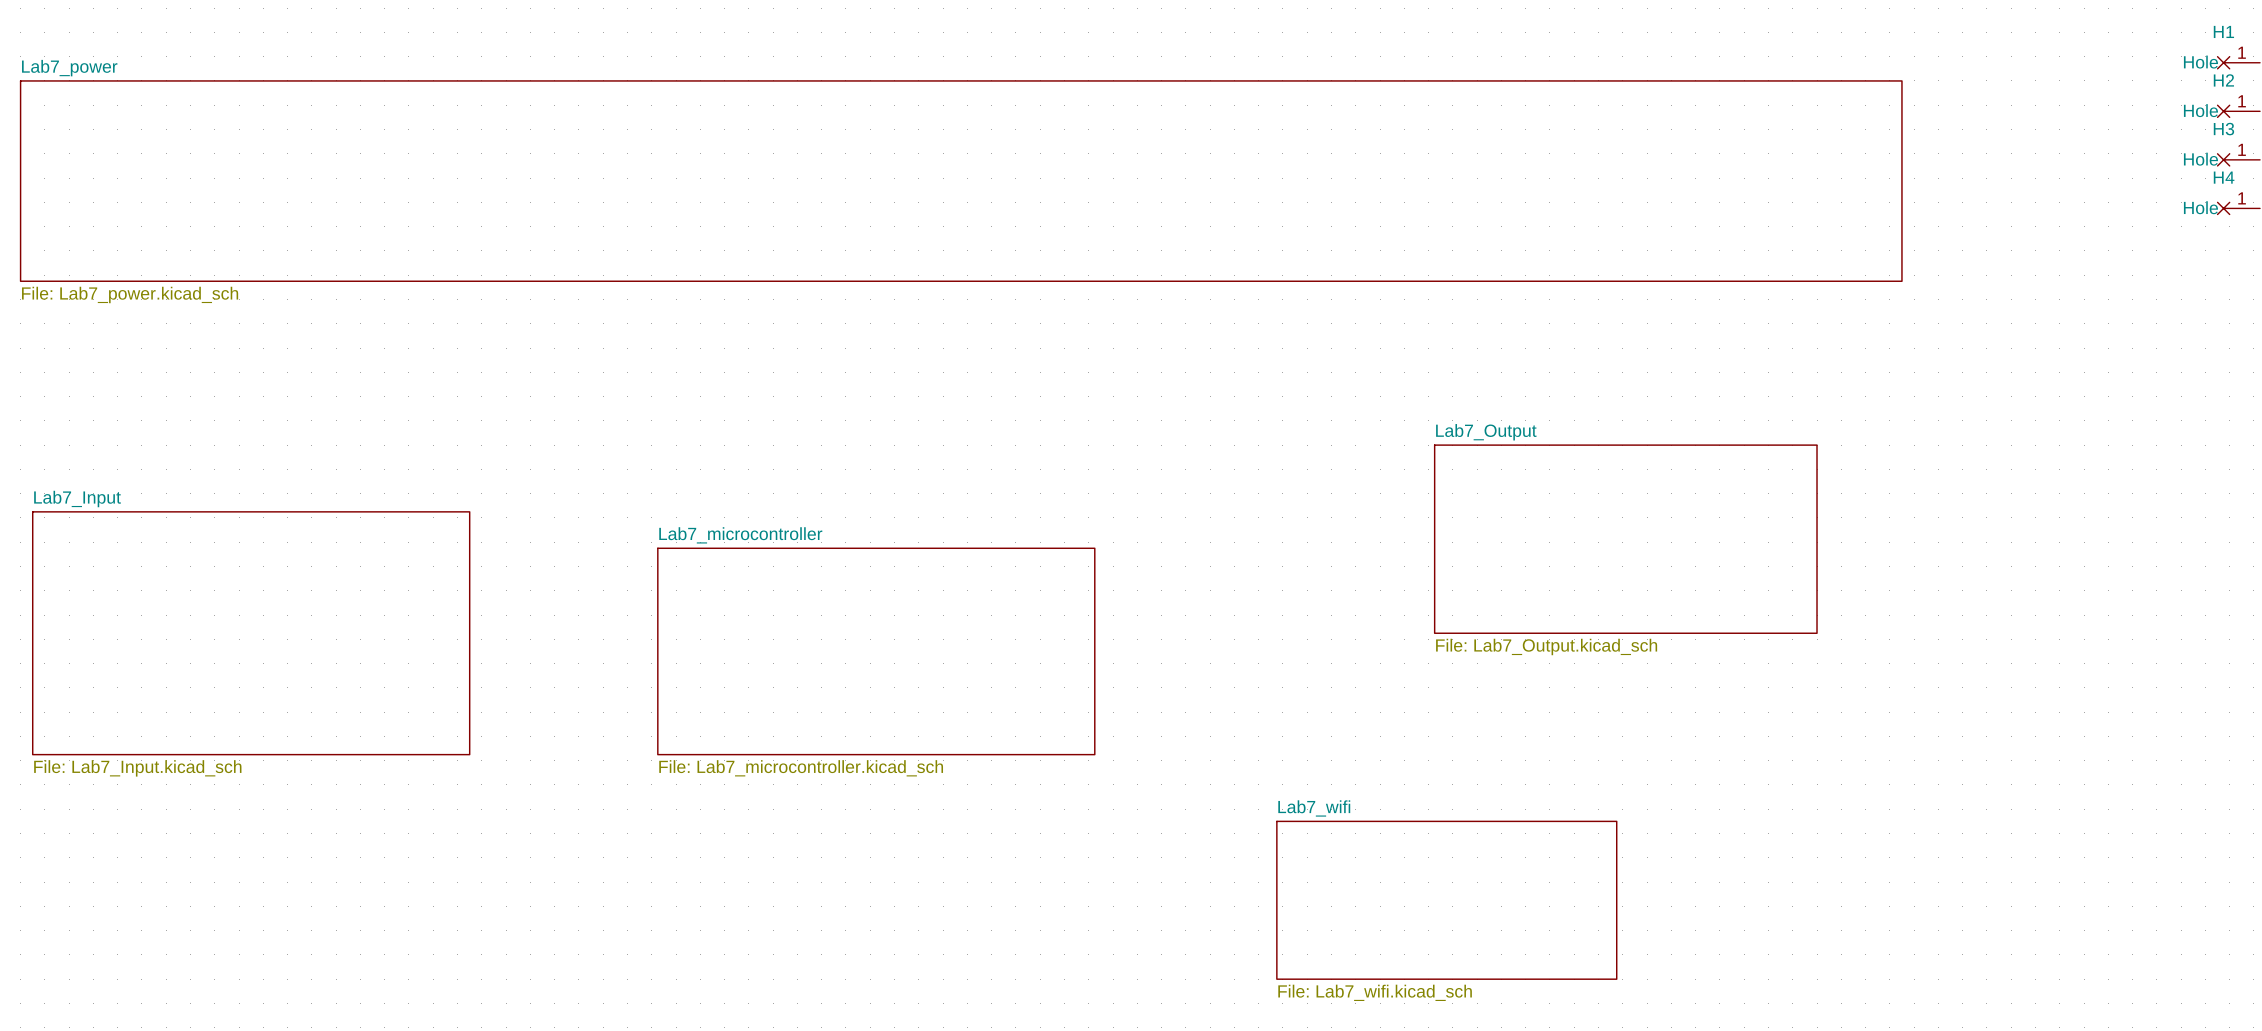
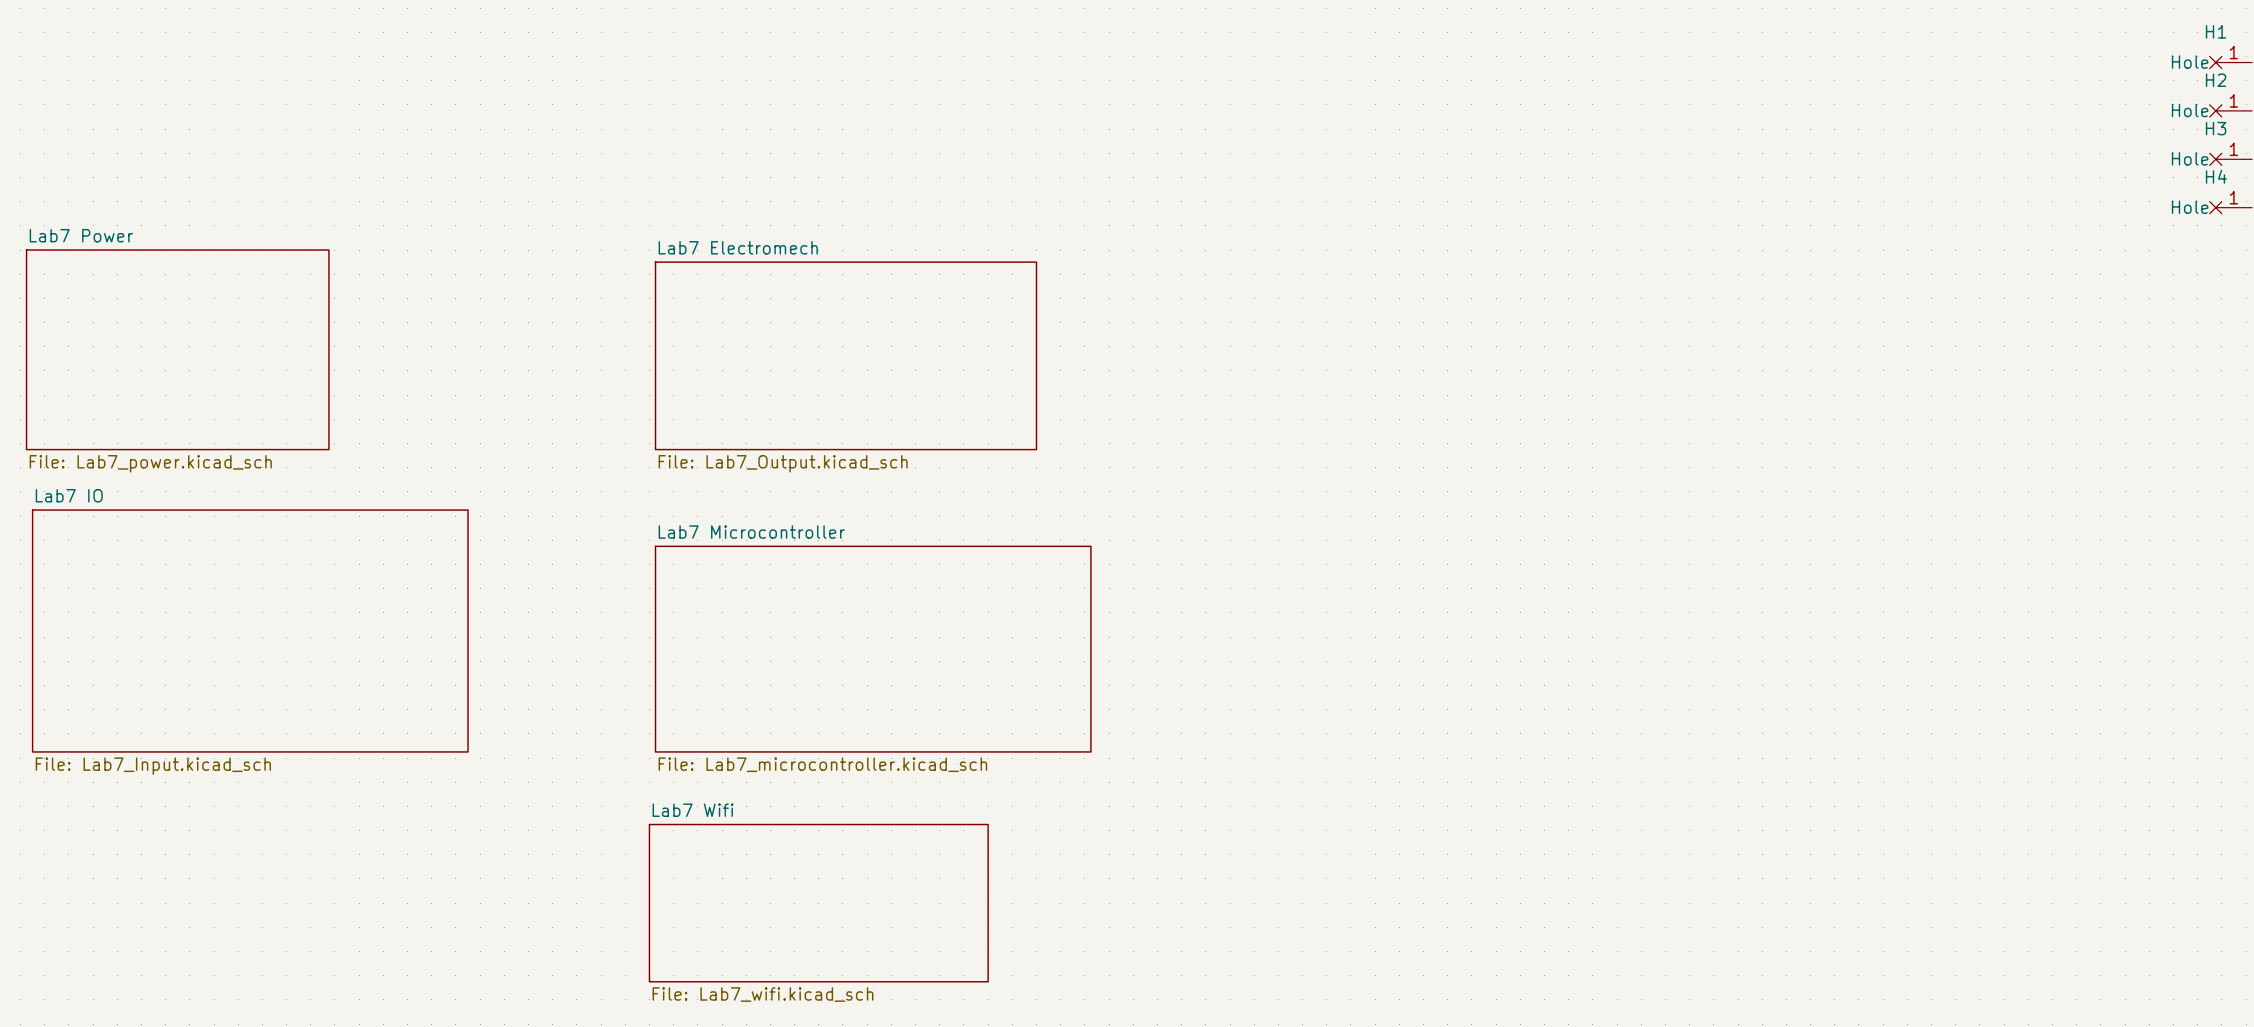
sheet Lab7_power: File: Lab7_power.kicad_sch (961, 181) -> none
sheet Lab7 Power: none -> File: Lab7_power.kicad_sch (177, 349)
sheet Lab7 Electromech: none -> File: Lab7_Output.kicad_sch (846, 355)
sheet Lab7_Input name: Lab7_Input (77, 499) -> Lab7 IO (69, 495)
sheet Lab7_microcontroller name: Lab7_microcontroller (740, 535) -> Lab7 Microcontroller (751, 532)
sheet Lab7_Output: File: Lab7_Output.kicad_sch (1625, 539) -> none
sheet Lab7_wifi: File: Lab7_wifi.kicad_sch (1446, 900) -> none
sheet Lab7 Wifi: none -> File: Lab7_wifi.kicad_sch (818, 903)

